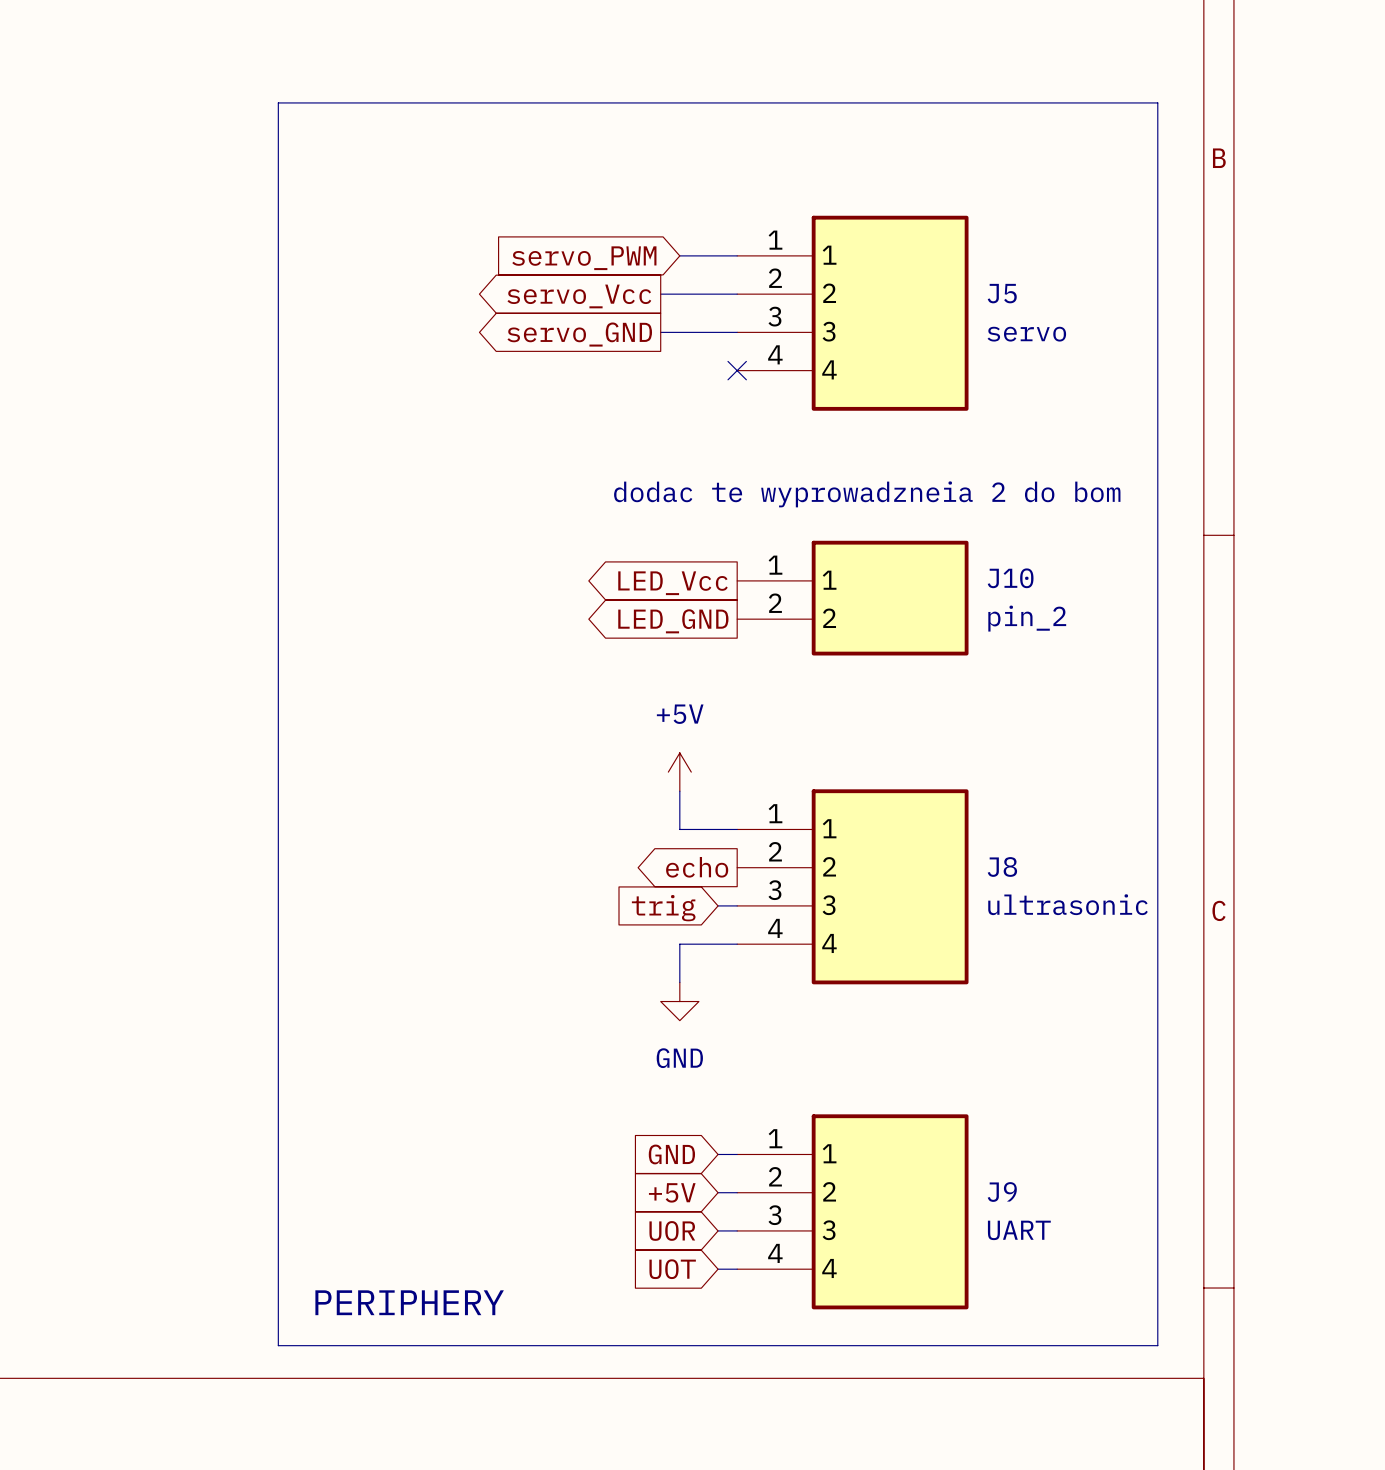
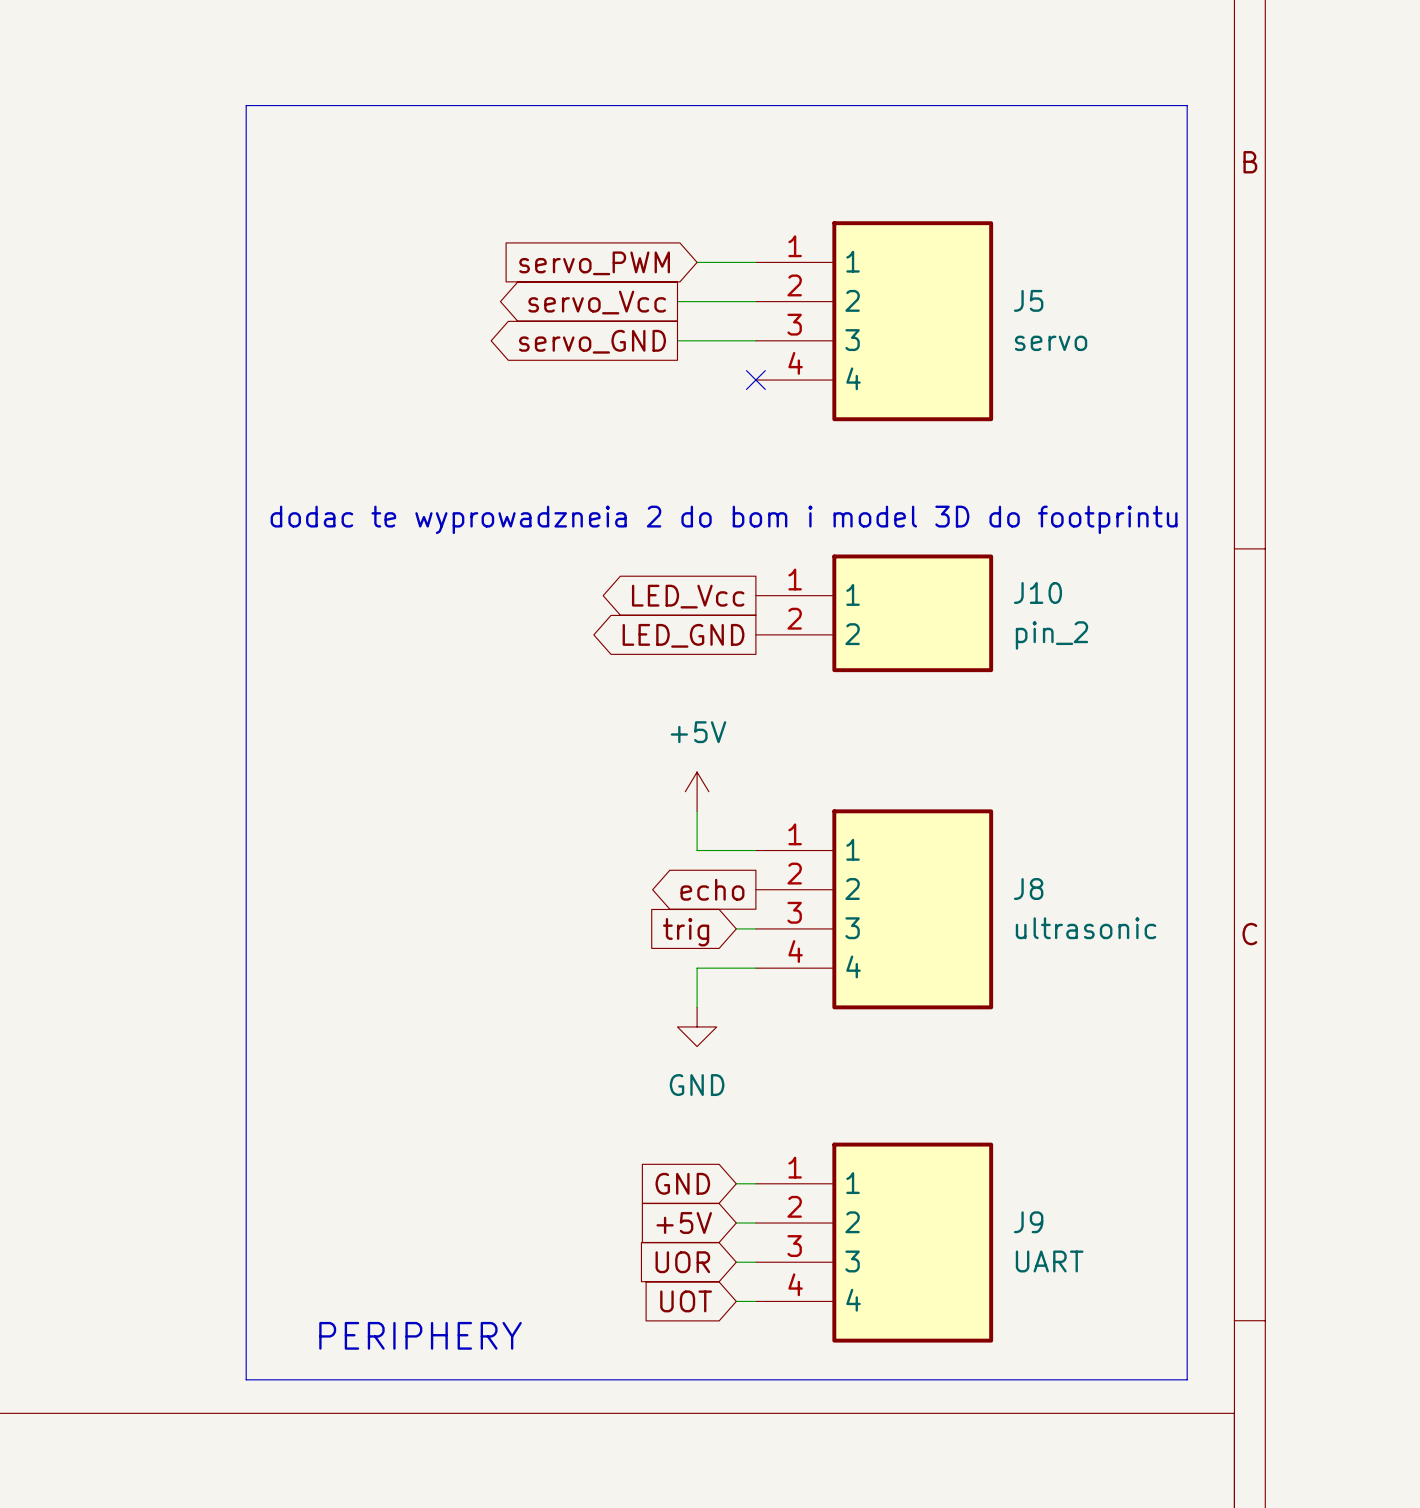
line: (278, 102) (278, 1345) -> (285, 105) (246, 105) (246, 1379) (285, 1379)
text: dodac te wyprowadzneia 2 do bom (867, 494) -> dodac te wyprowadzneia 2 do bom i model 3D do footprintu (724, 519)

